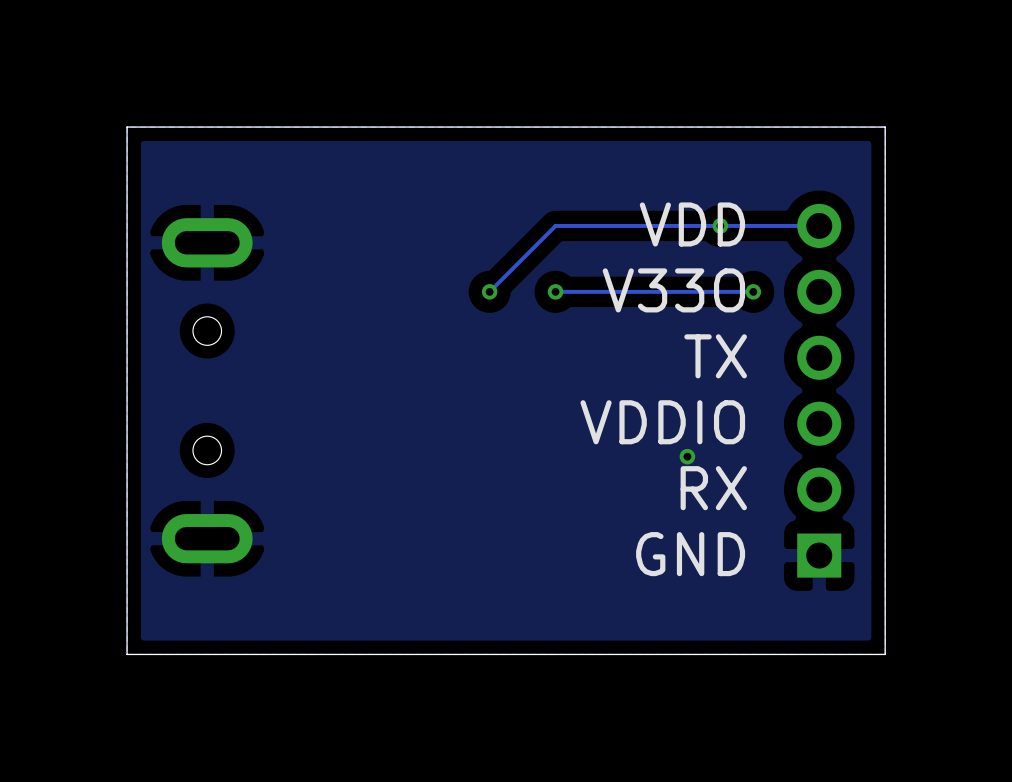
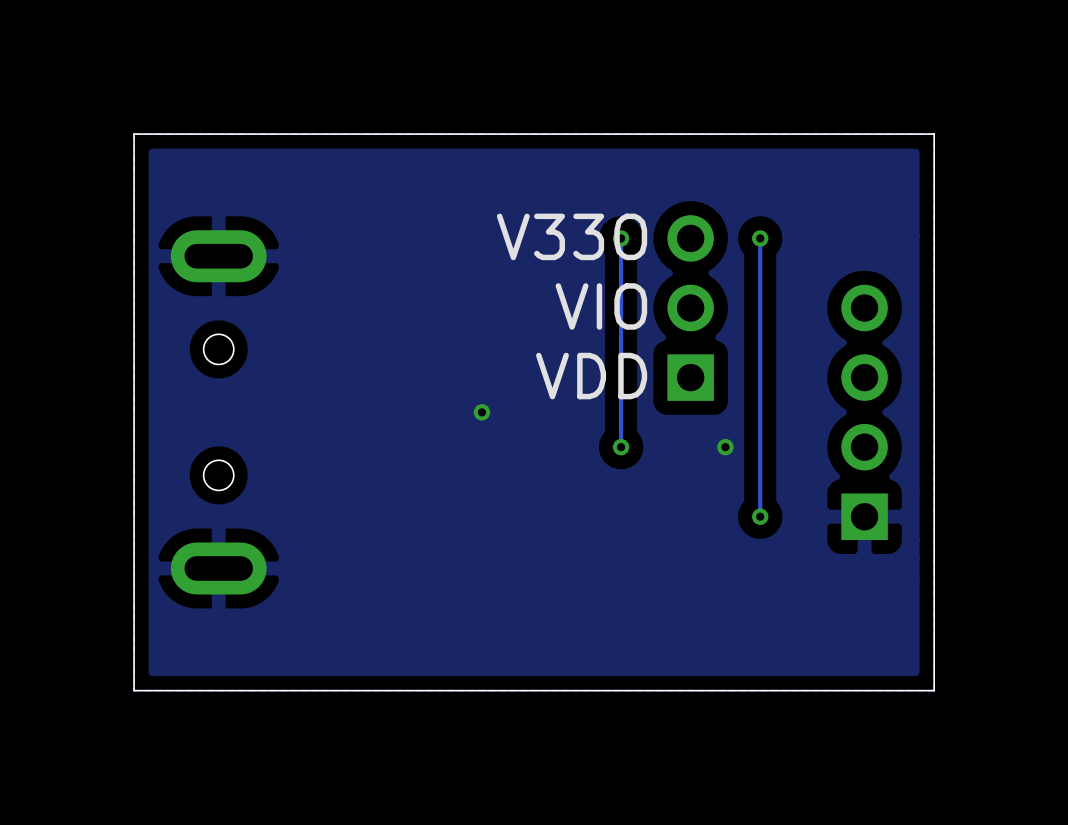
part footprint: [797, 203, 842, 578] -> [841, 284, 888, 541]
text position: VDD (692, 224) -> VDD (591, 376)
track: none -> (621, 238) (621, 447)
via: none -> (621, 238)
track: none -> (760, 238) (760, 516)
track: (819, 225) (555, 225) (489, 291) -> none
text: none -> VIO (601, 306)
text position: V33O (673, 290) -> V33O (572, 236)
via: (489, 291) -> none
via: (555, 291) -> none
part: none -> (690, 308)
track: (753, 291) (555, 291) -> none
via: (753, 291) -> none
text: TX (715, 356) -> none
via: none -> (481, 412)
text: VDDIO (662, 422) -> none
via: none -> (621, 447)
via: none -> (725, 447)
via: (687, 456) -> none
text: RX (713, 488) -> none
via: none -> (760, 516)
text: GND (690, 554) -> none

